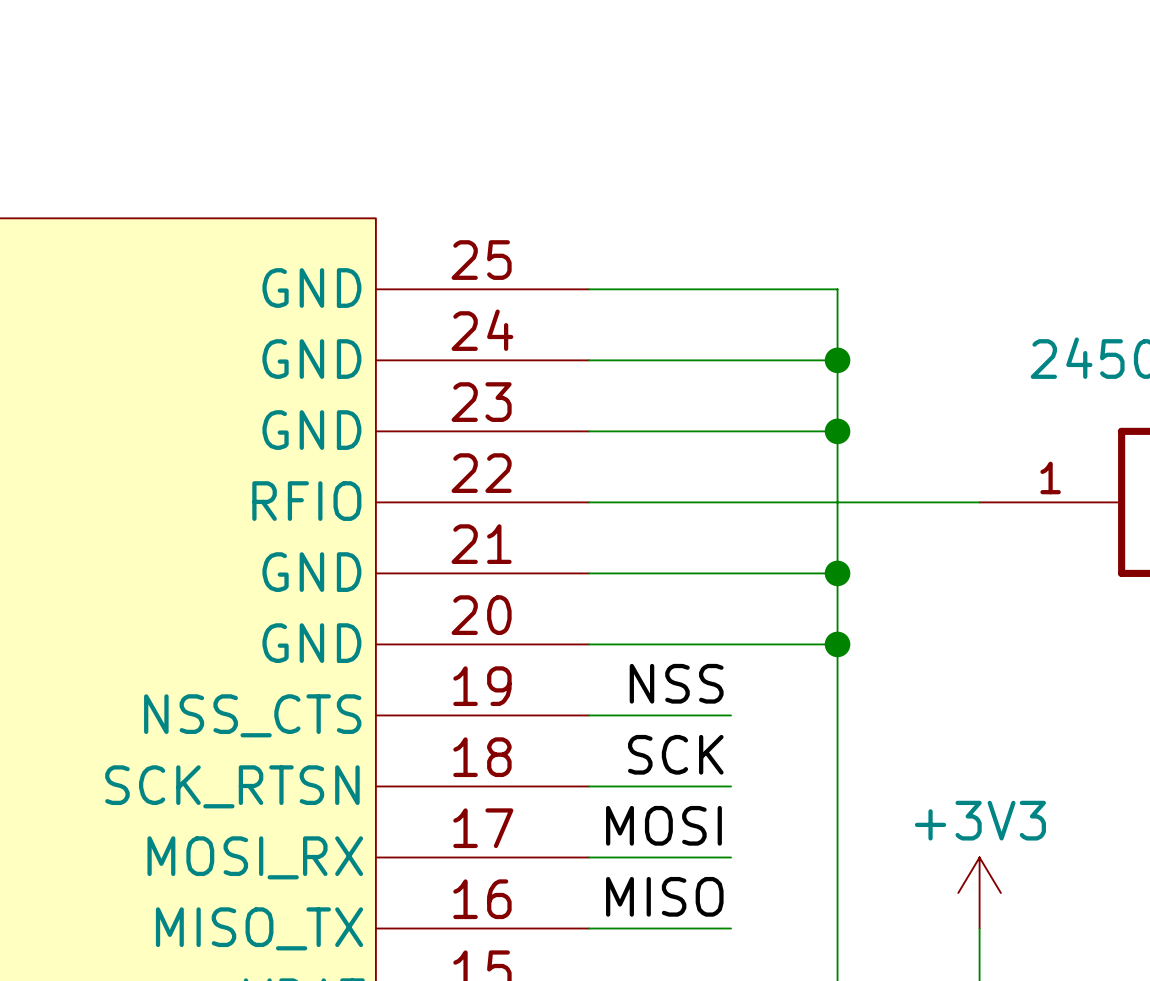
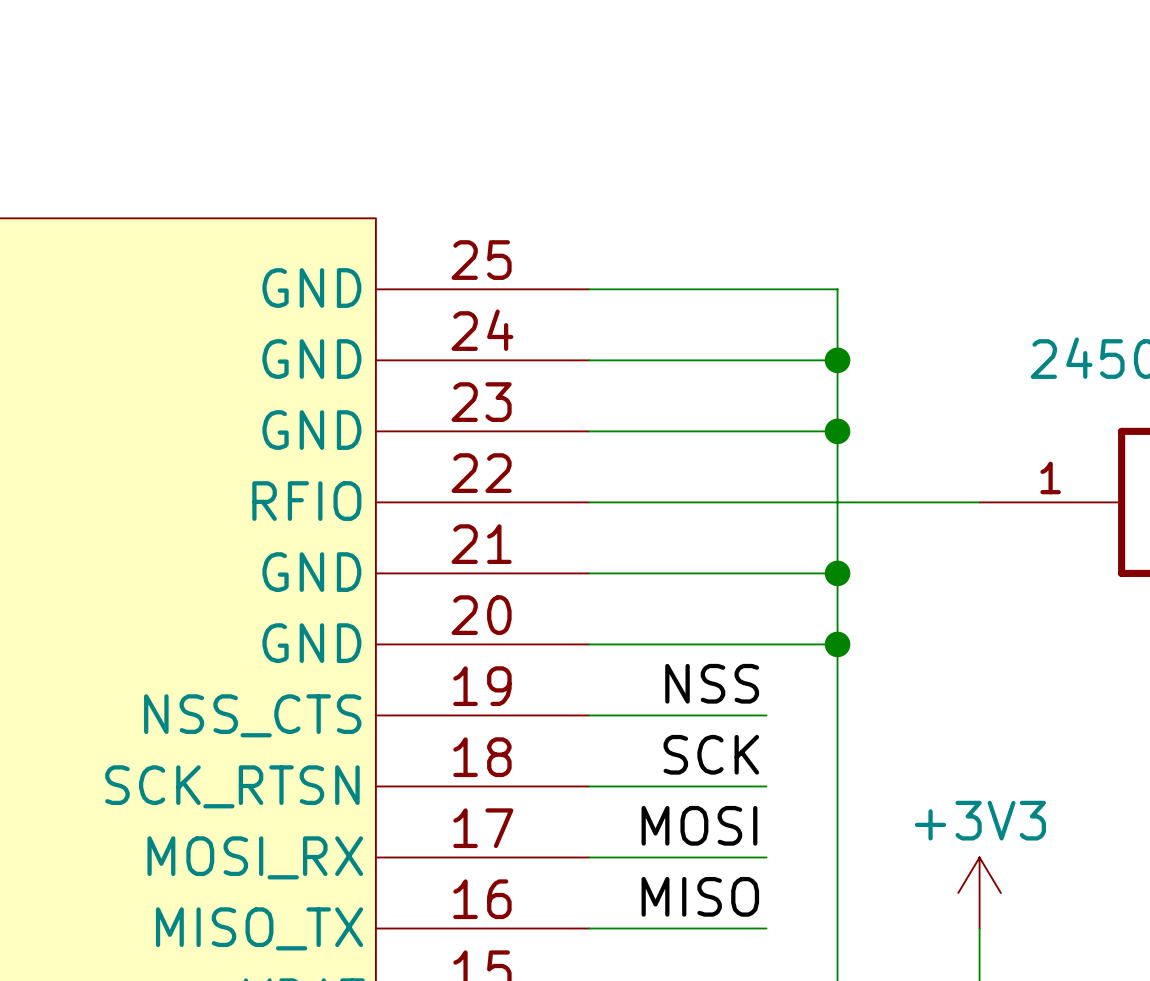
label position: NSS (676, 683) -> NSS (712, 683)
wire: none -> (731, 715) (766, 715)
label position: SCK (675, 754) -> SCK (711, 754)
wire: none -> (731, 786) (766, 786)
label position: MOSI (663, 825) -> MOSI (699, 825)
wire: none -> (731, 857) (766, 857)
label position: MISO (664, 896) -> MISO (700, 896)
wire: none -> (731, 928) (766, 928)

